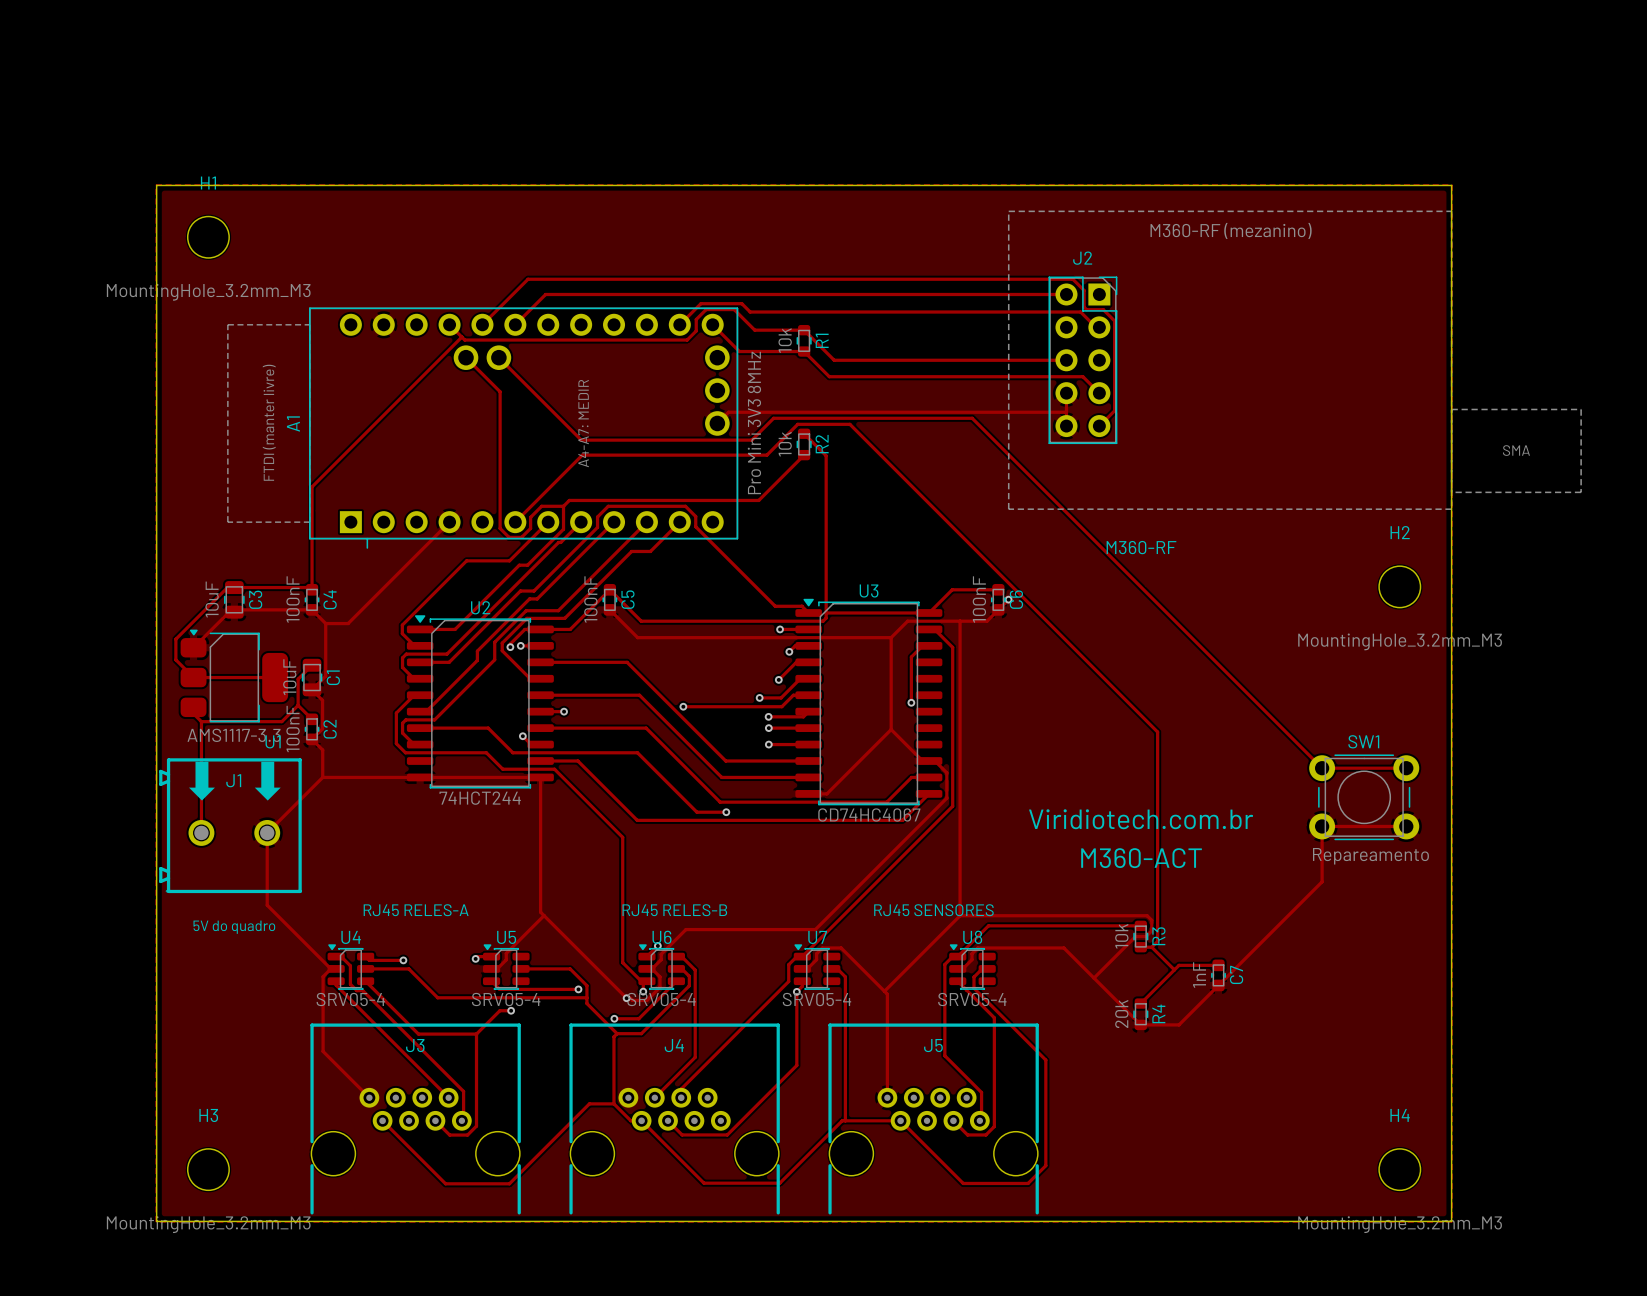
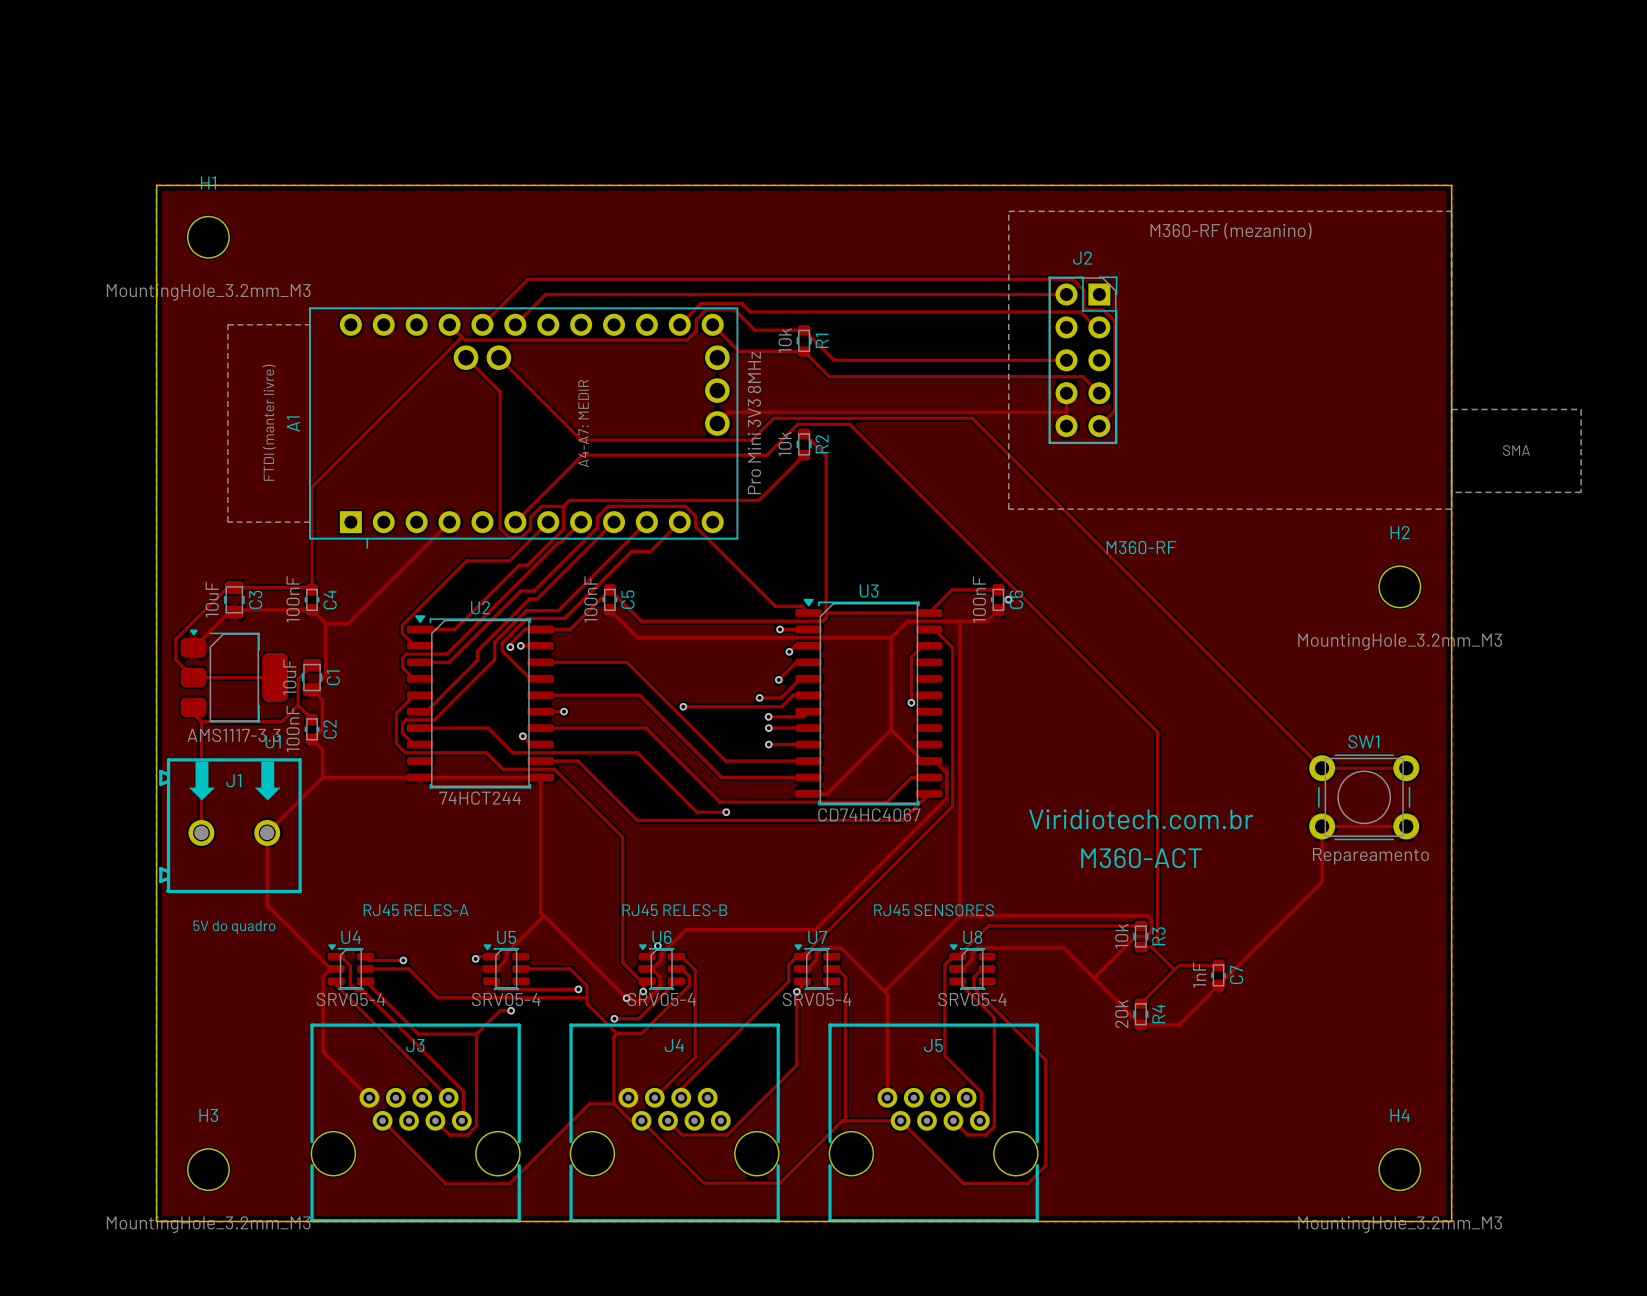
J3 footprint: [310, 1023, 521, 1215] -> [310, 1023, 521, 1223]
J4 footprint: [569, 1023, 780, 1215] -> [569, 1023, 780, 1223]
J5 footprint: [828, 1023, 1039, 1215] -> [828, 1023, 1039, 1223]

